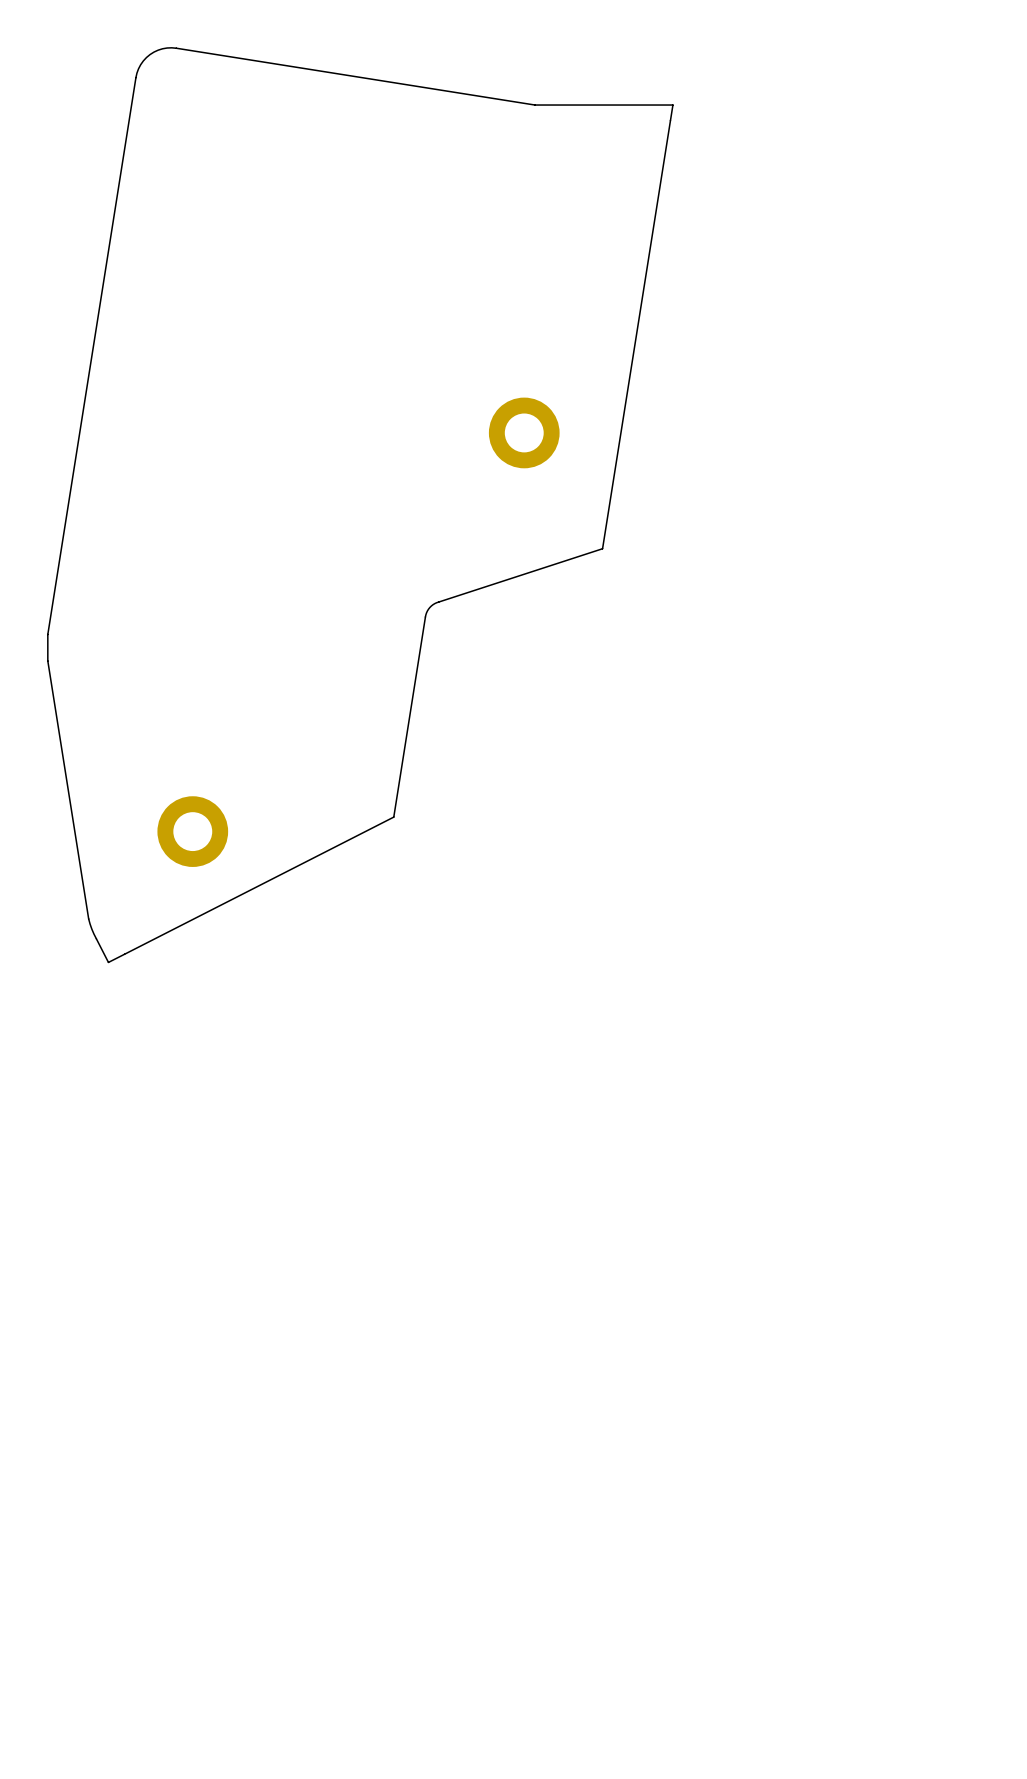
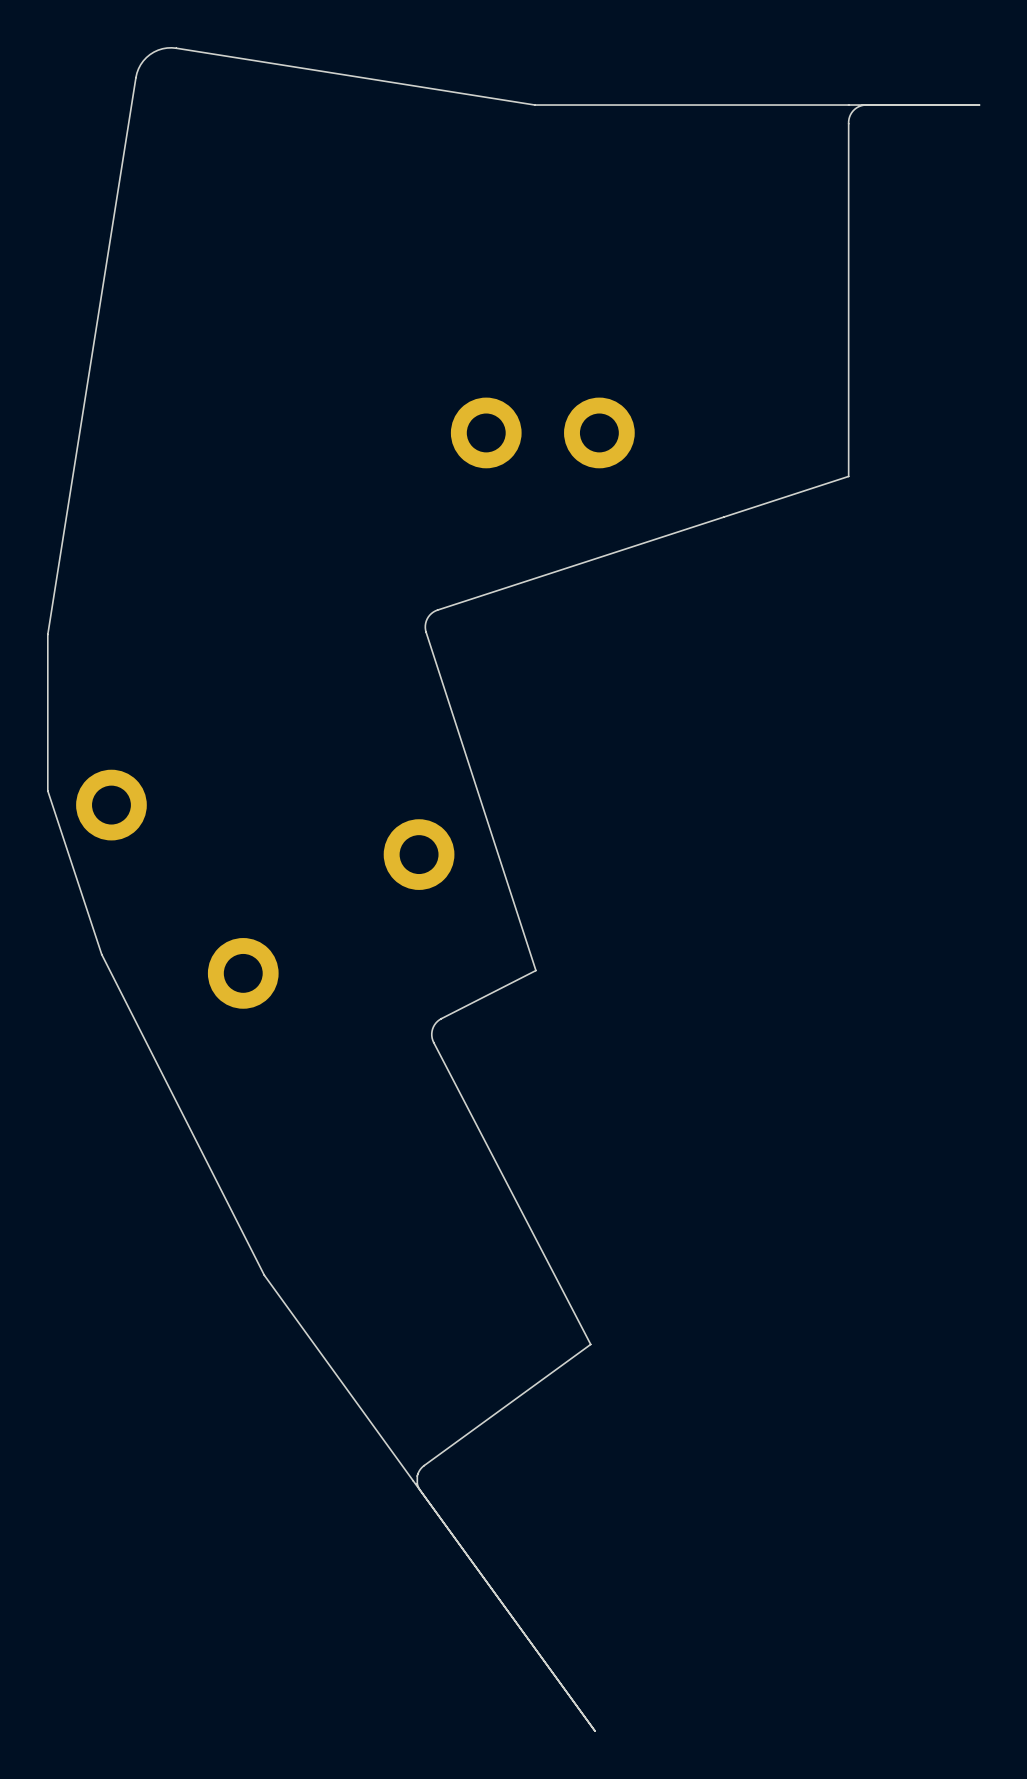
board edge: (672, 105) (602, 548) (436, 602) (428, 609) (425, 616) (393, 817) (108, 962) (88, 918) (47, 661) -> (865, 105) (853, 110) (848, 121) (848, 476) (437, 610) (429, 615) (425, 623) (426, 632) (535, 970) (439, 1019) (432, 1028) (432, 1038) (590, 1344) (424, 1465) (417, 1474) (417, 1483) (595, 1731) (264, 1275) (101, 954) (47, 790) (47, 661)
board edge: none -> (979, 105) (672, 105)
part: none -> (486, 432)
part: (524, 432) -> none
part: none -> (599, 432)
part: none -> (111, 805)
part: (192, 831) -> none
part: none -> (419, 854)
part: none -> (243, 973)

